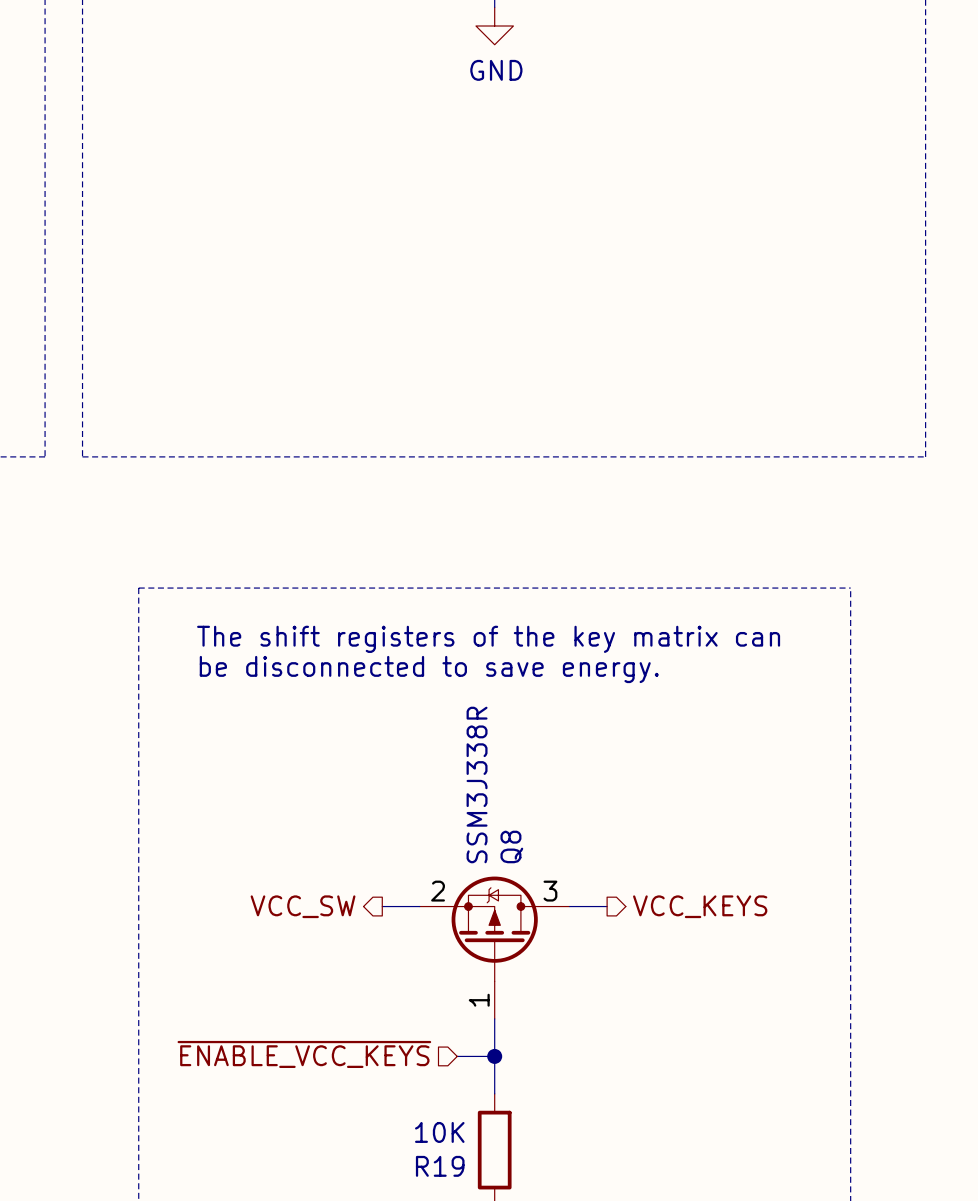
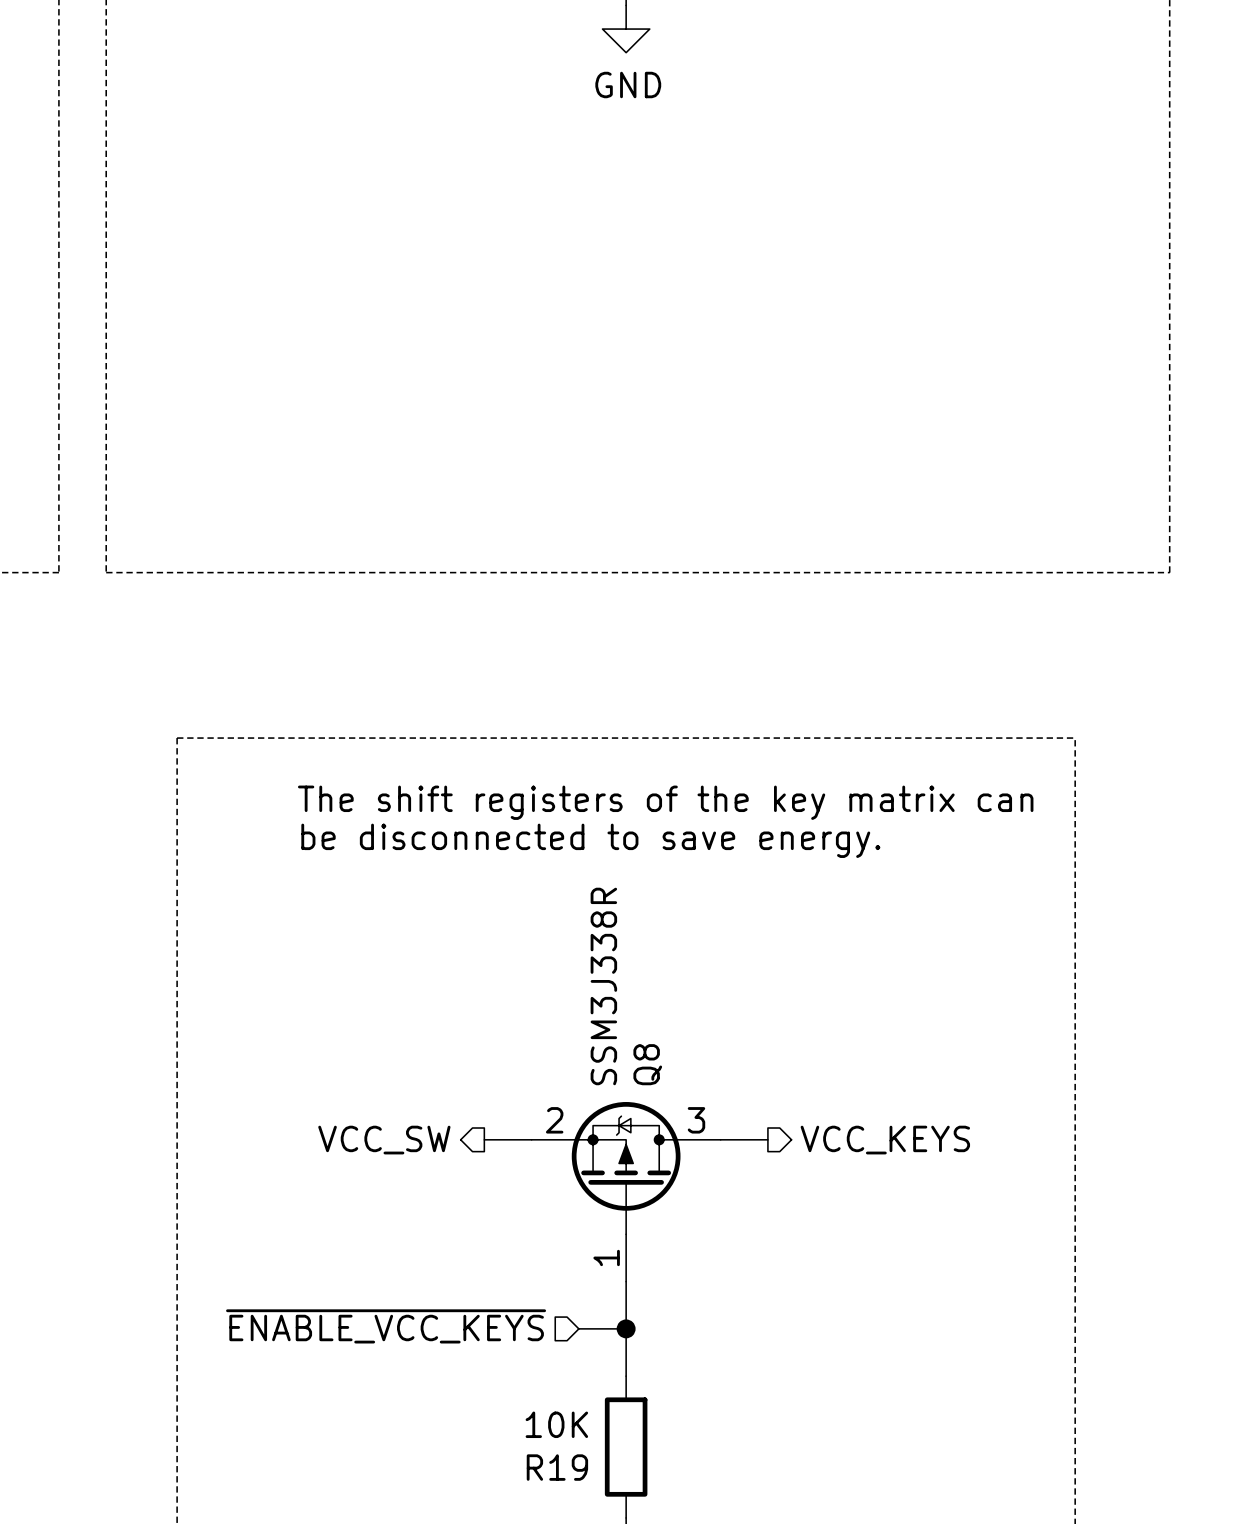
text position: The shift registers of the key matrix can (488, 639) -> The shift registers of the key matrix can (665, 802)
text position: be disconnected to save energy. (429, 669) -> be disconnected to save energy. (590, 840)

